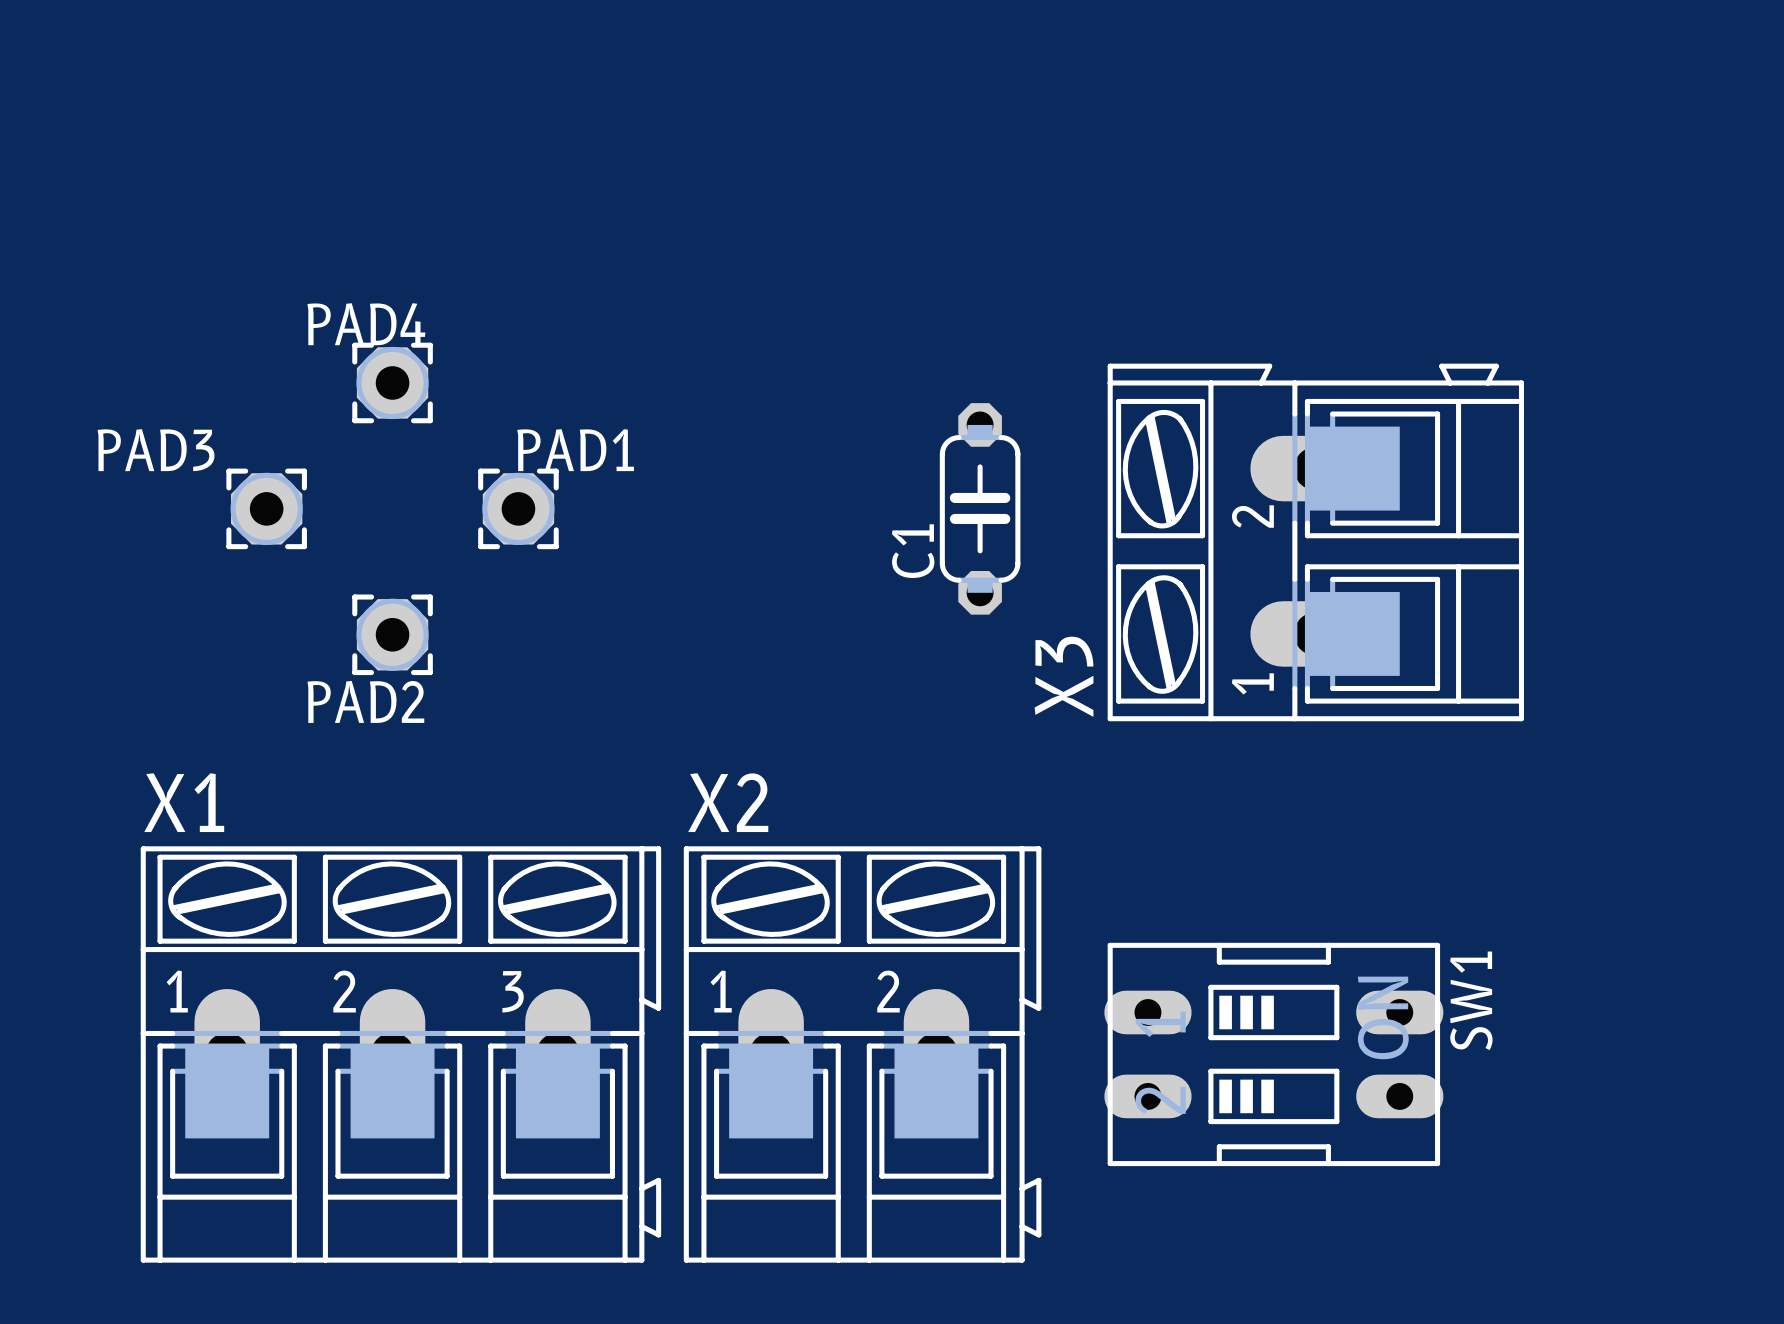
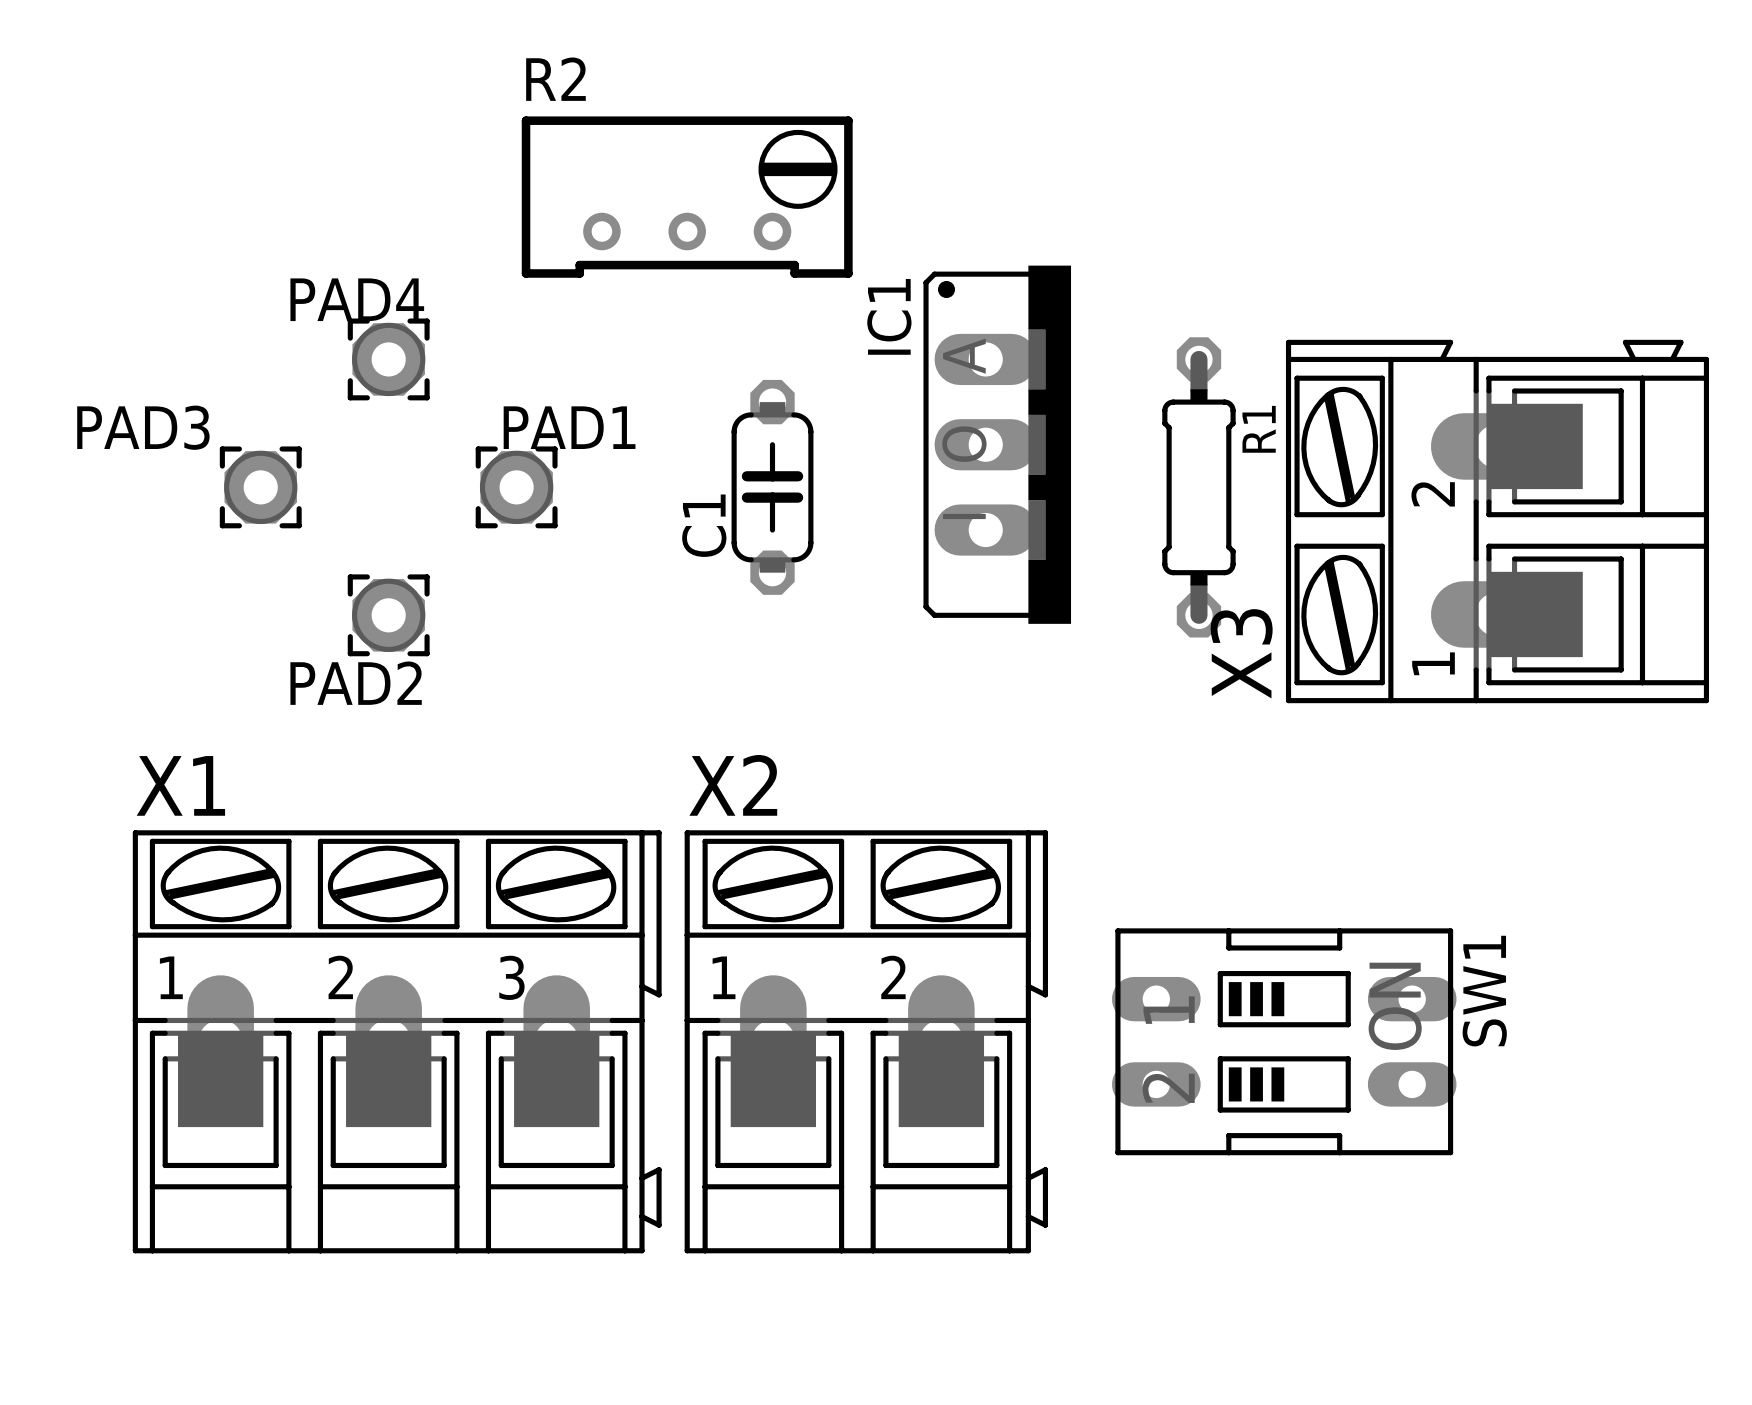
R2: none -> (687, 197)
IC1: none -> (997, 444)
C1 position: (980, 508) -> (772, 487)
R1: none -> (1198, 487)
X3 position: (1315, 542) -> (1497, 521)

